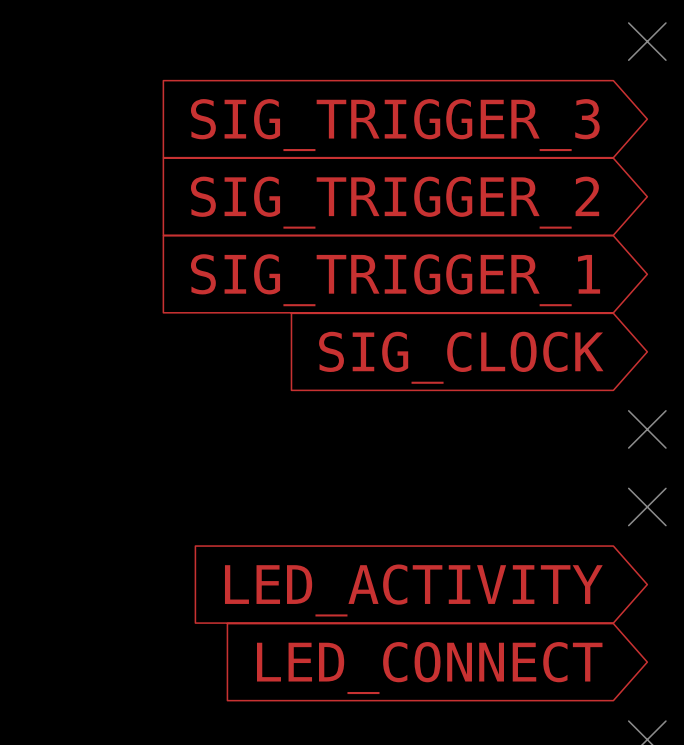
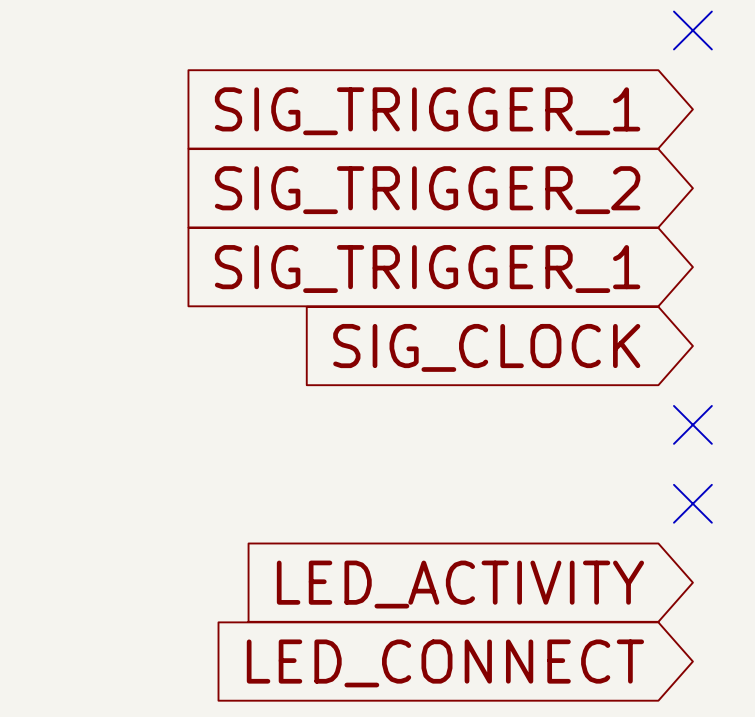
global label: SIG_TRIGGER_3 (395, 125) -> SIG_TRIGGER_1 (427, 111)

